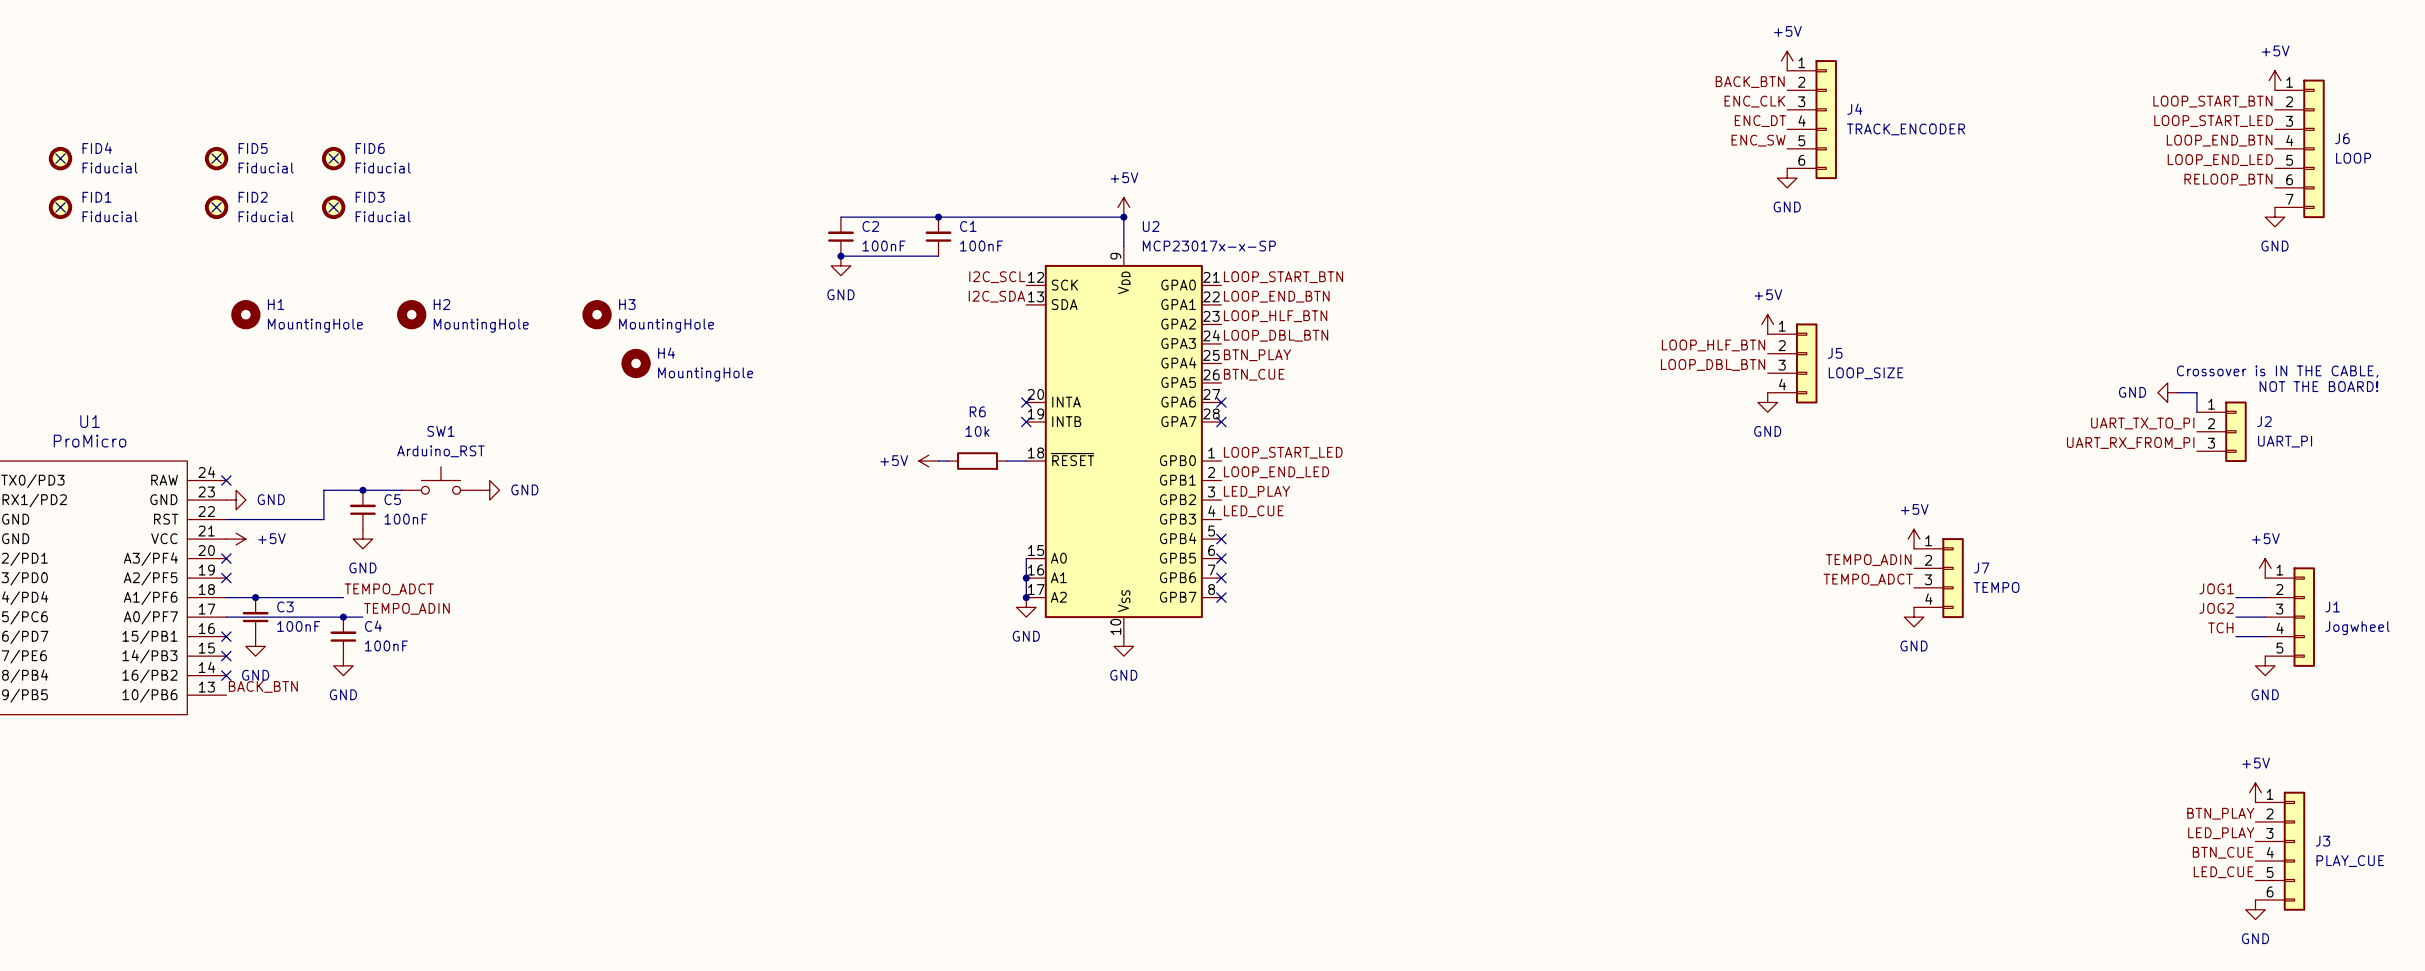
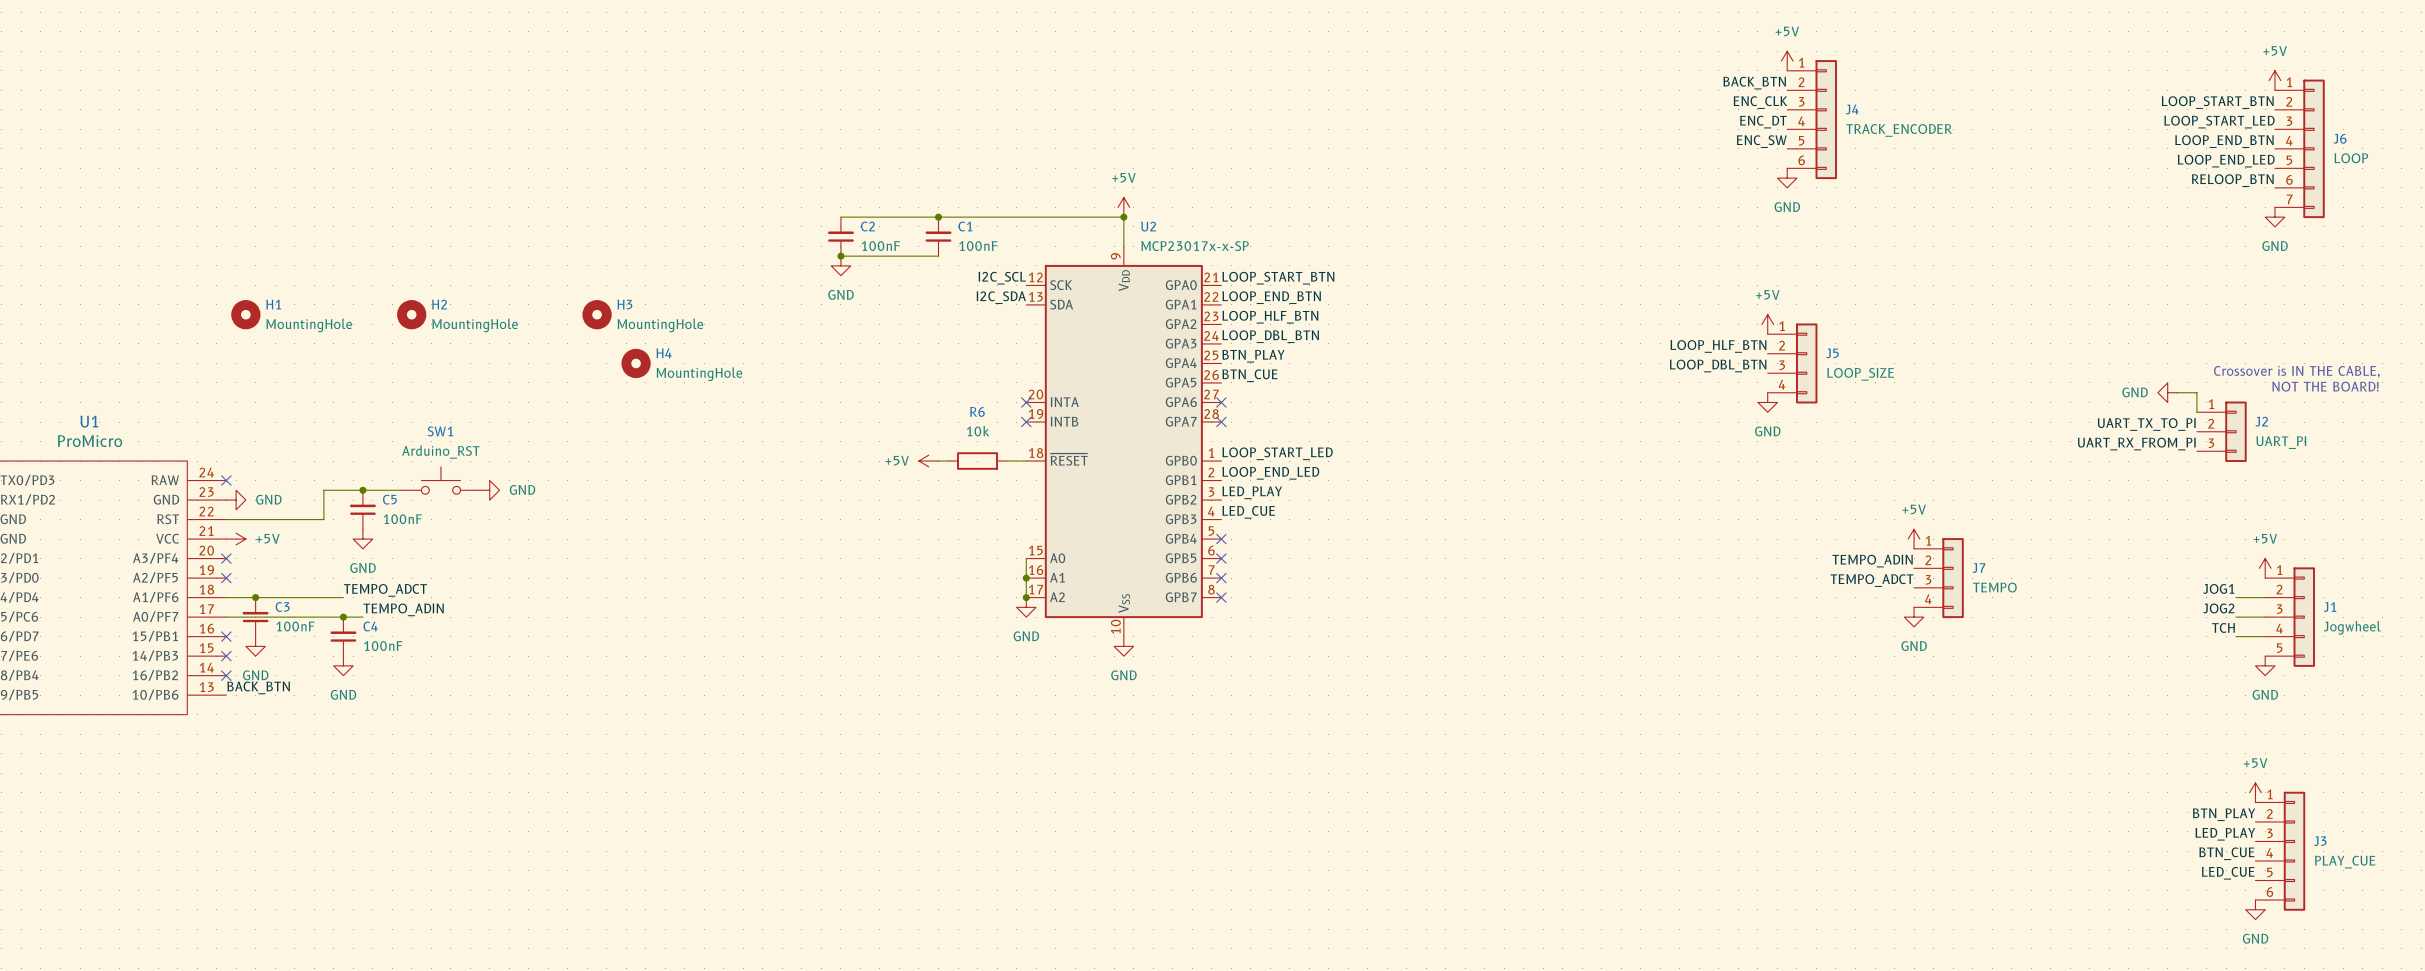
no-connect mark: (60, 158) -> none
FID4: Fiducial (60, 158) -> none
no-connect mark: (216, 158) -> none
FID5: Fiducial (216, 158) -> none
no-connect mark: (333, 158) -> none
FID6: Fiducial (333, 158) -> none
no-connect mark: (60, 207) -> none
FID1: Fiducial (60, 207) -> none
no-connect mark: (216, 207) -> none
FID2: Fiducial (216, 207) -> none
no-connect mark: (333, 207) -> none
FID3: Fiducial (333, 207) -> none

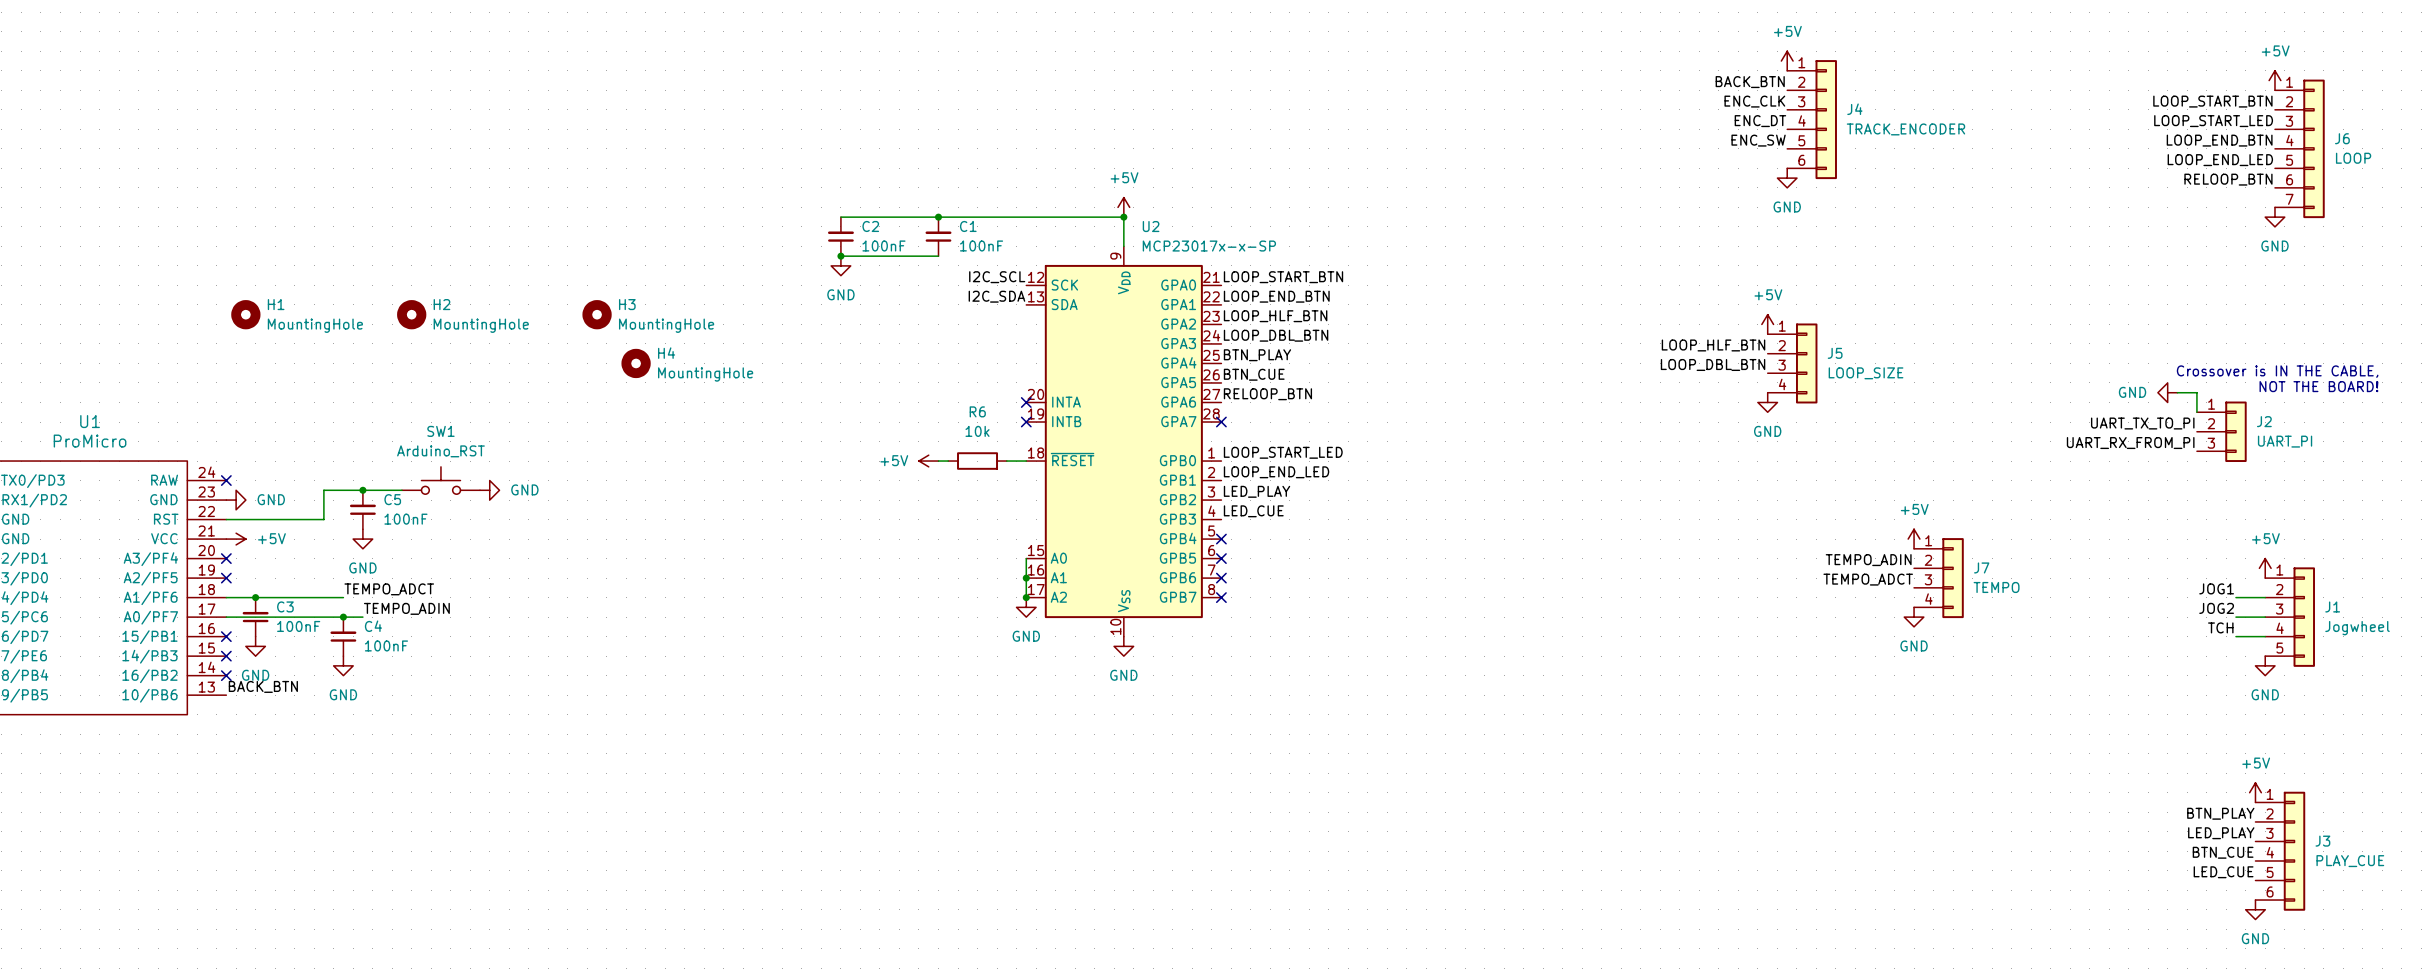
label: none -> RELOOP_BTN (1267, 394)
no-connect mark: (1221, 402) -> none

